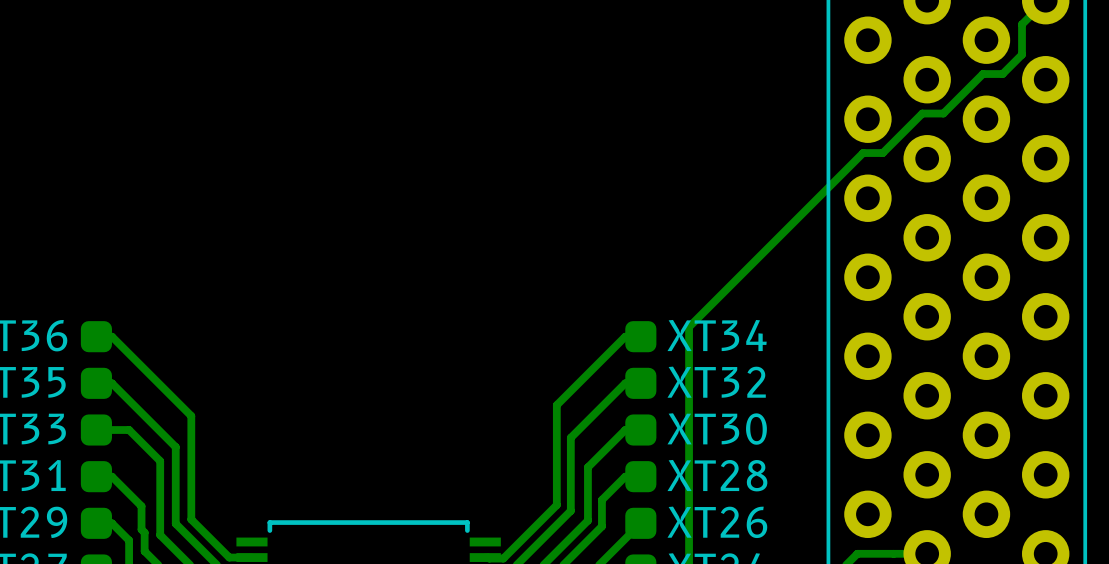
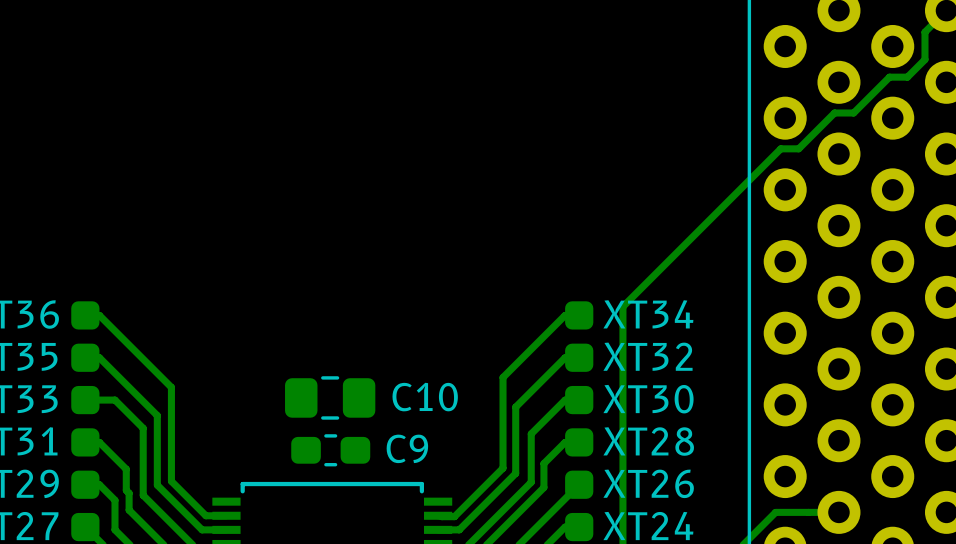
C10: none -> (330, 397)
C9: none -> (330, 450)

